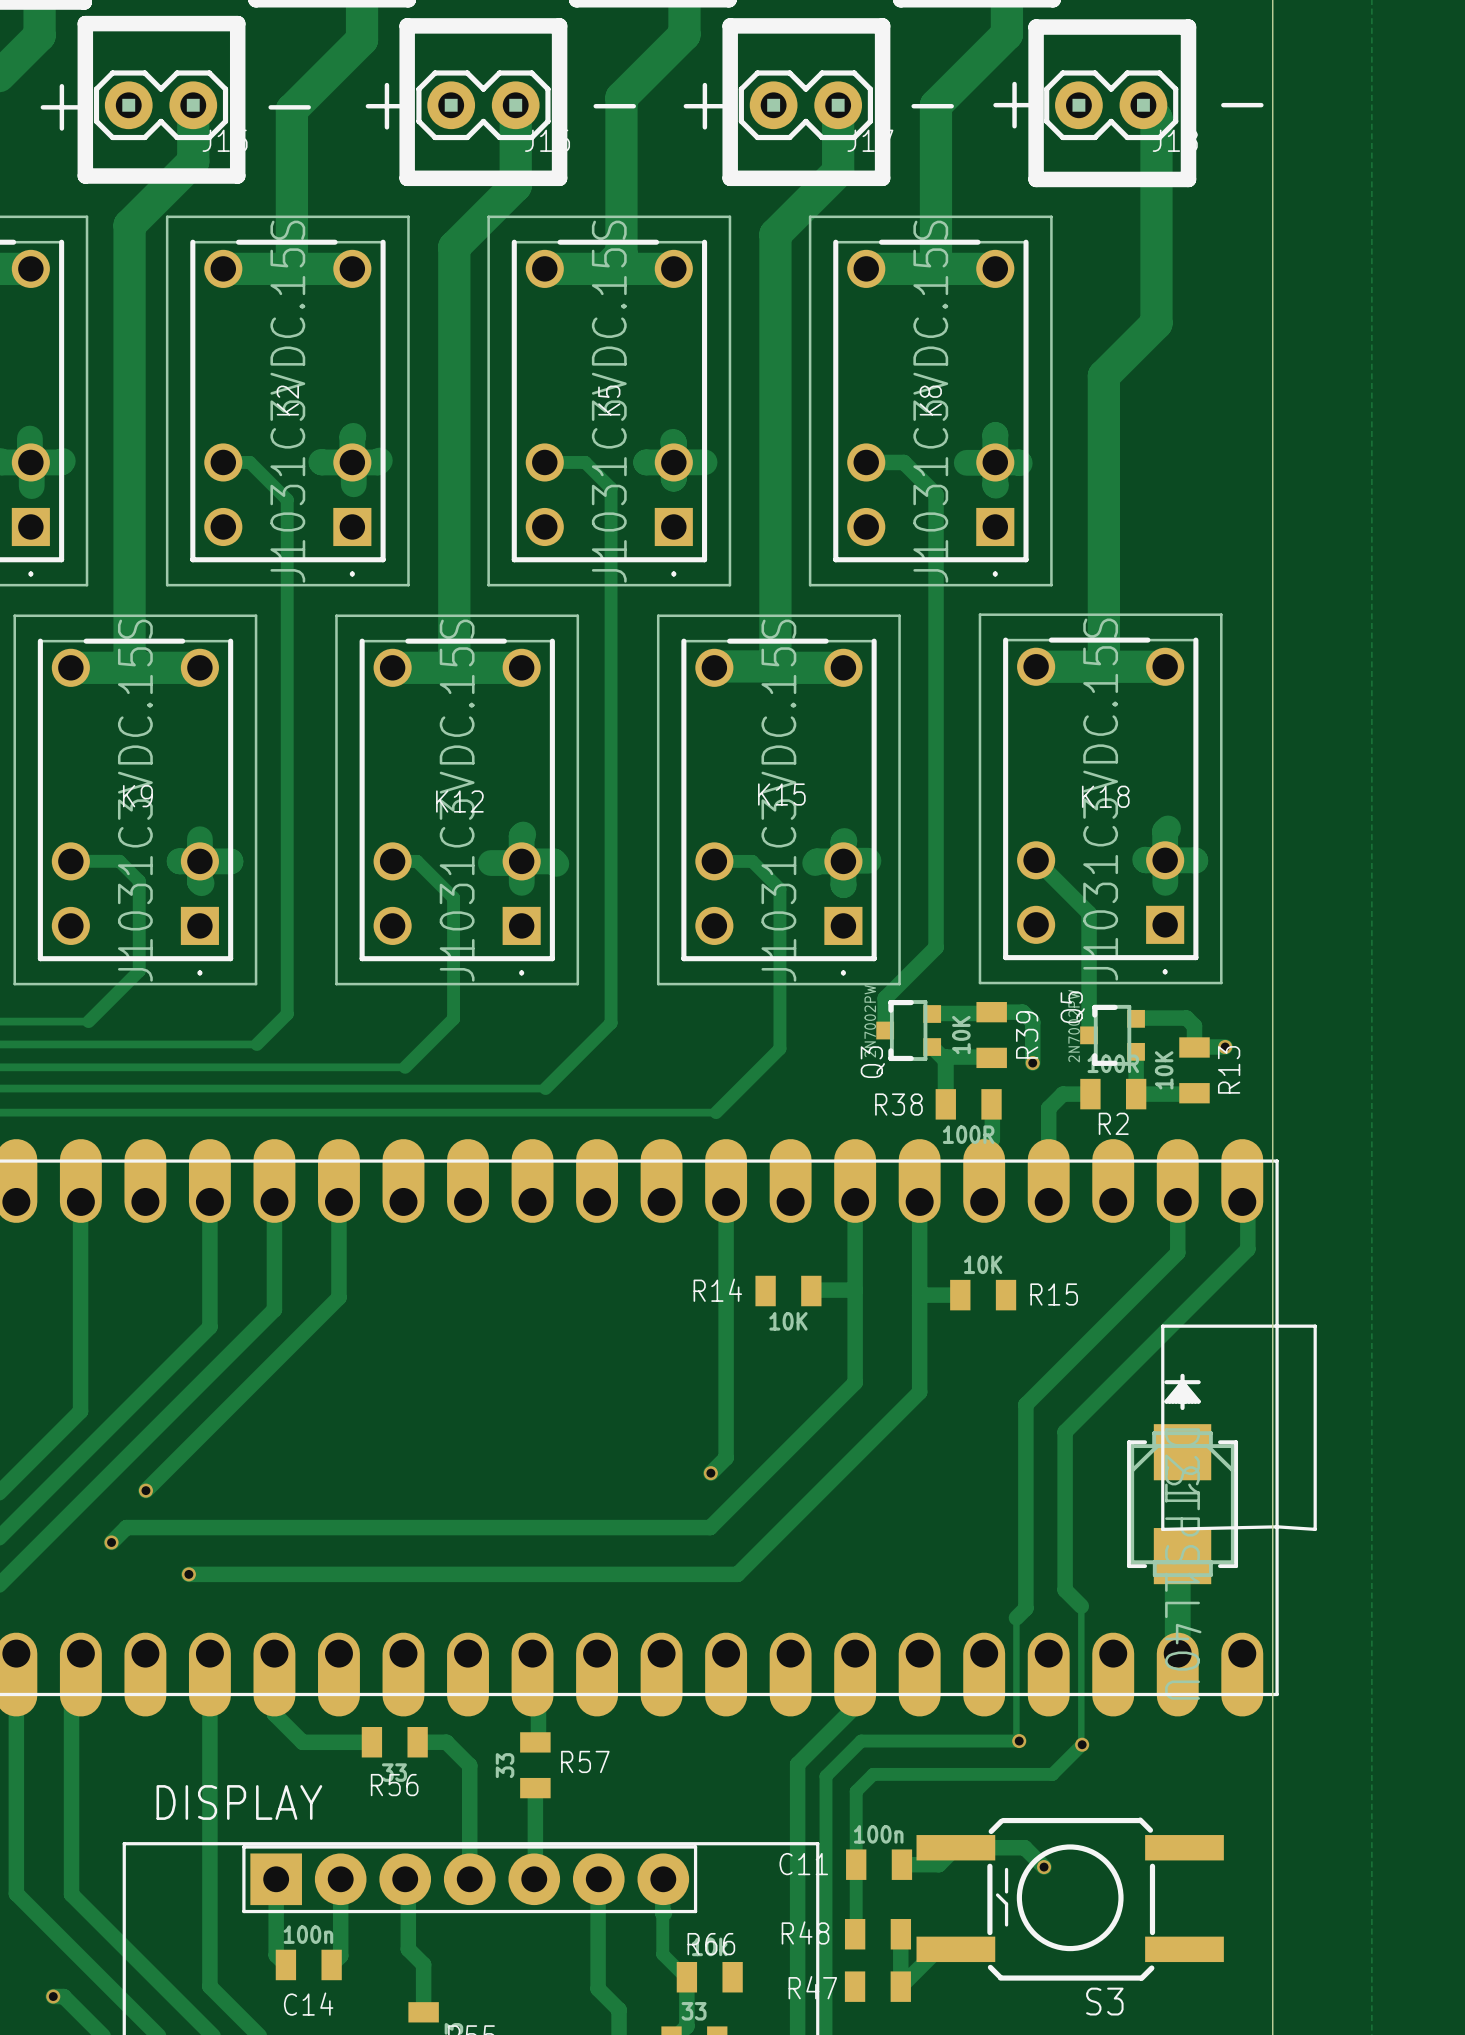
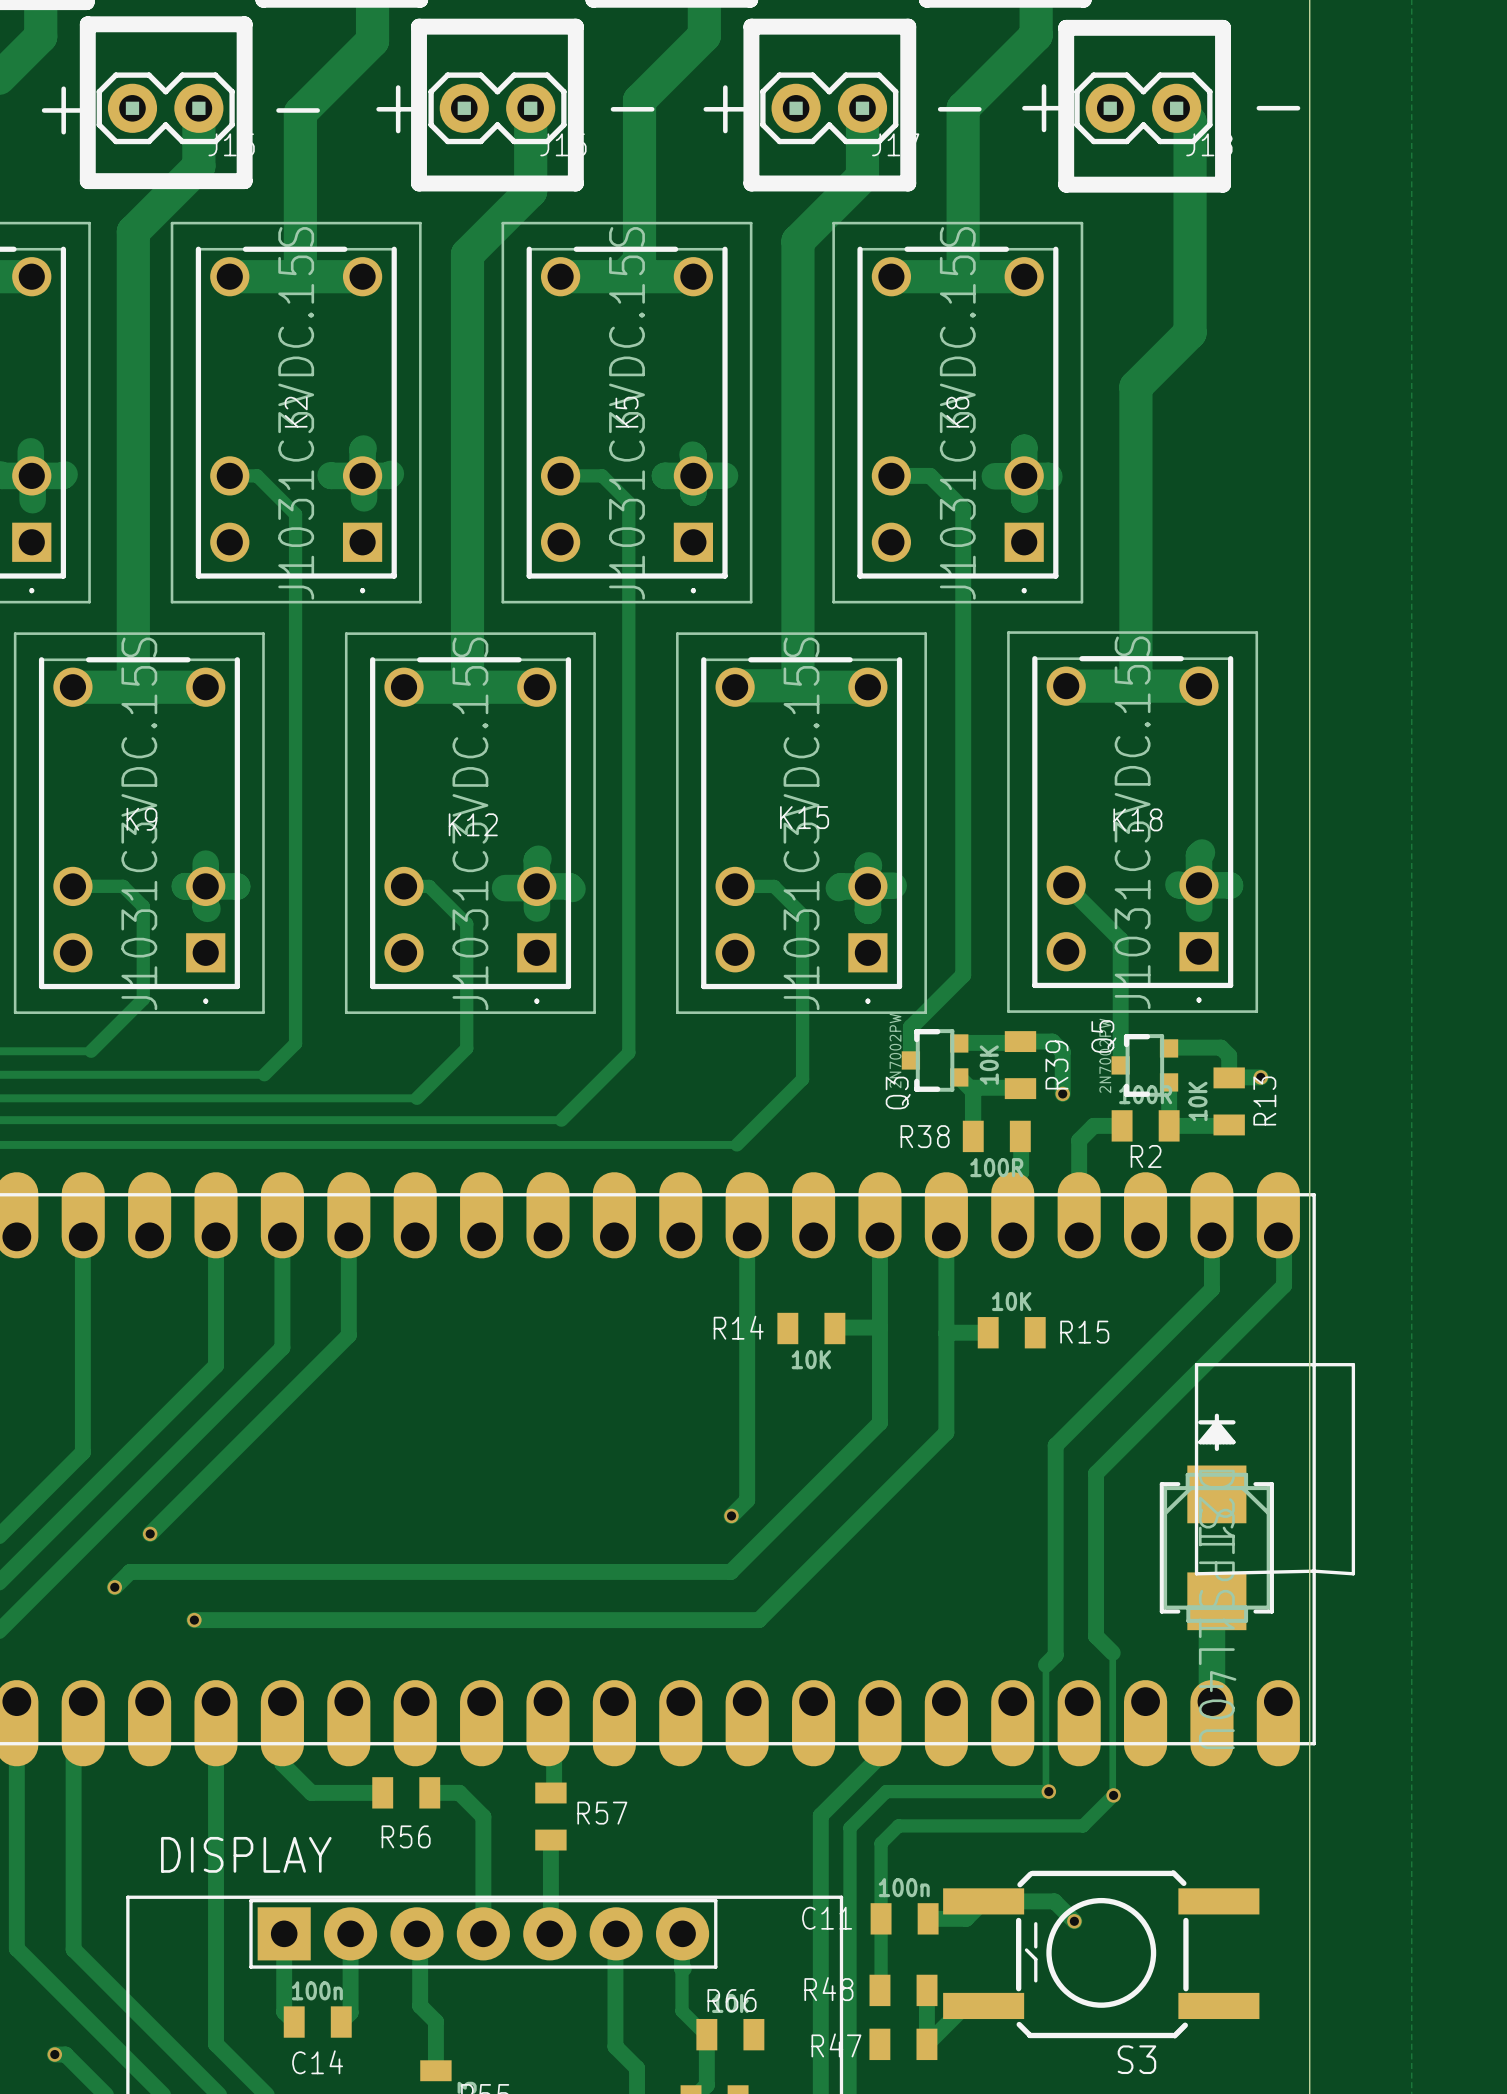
R57 value: 33 (505, 1765) -> none
R56 value: 33 (394, 1772) -> none
part value: 33 (694, 2011) -> none

